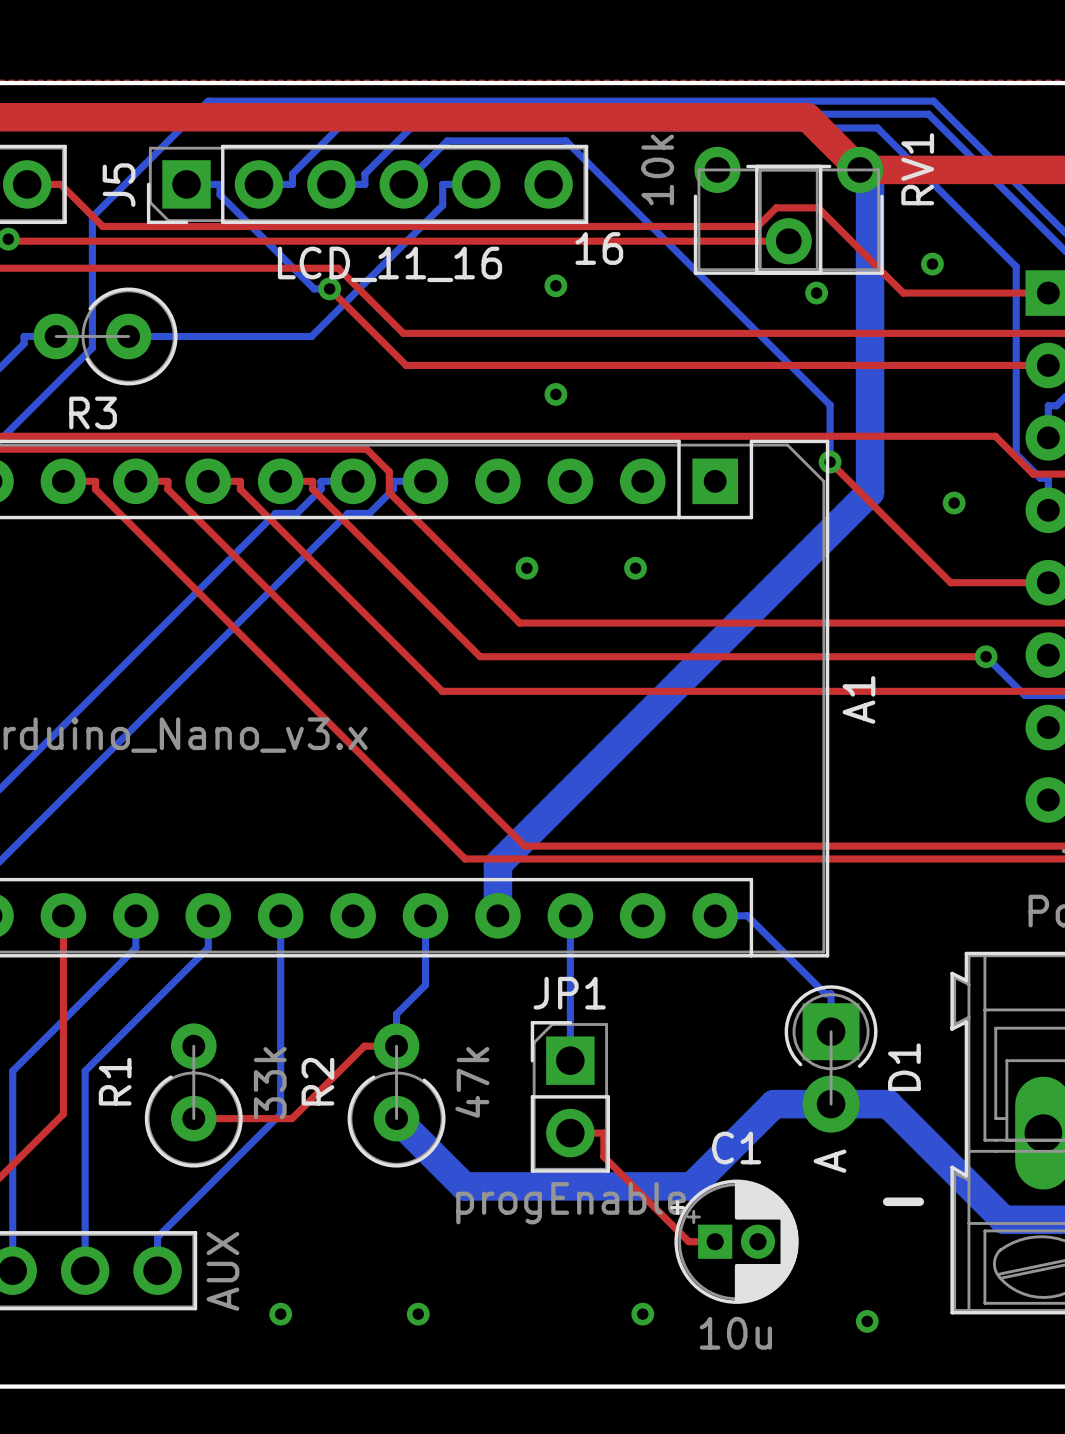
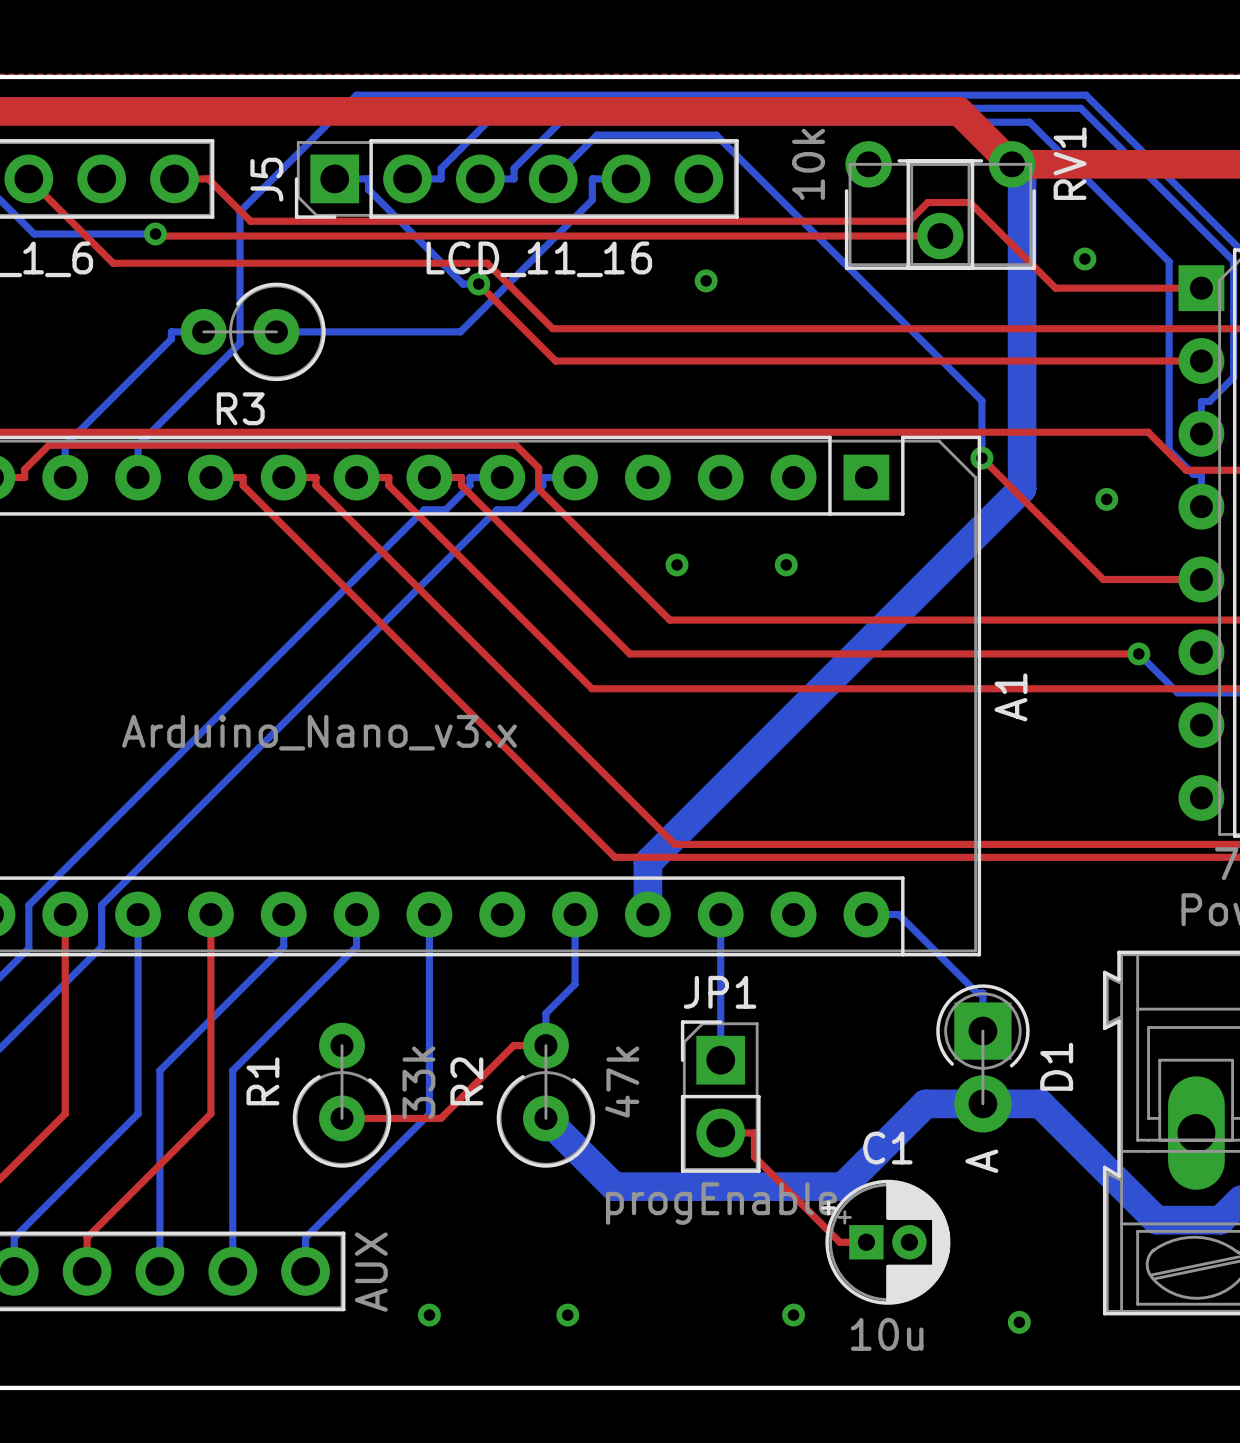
text: 16 (599, 248) -> none
via: (816, 293) -> none
via: (555, 394) -> none
text: - (903, 1201) -> none

